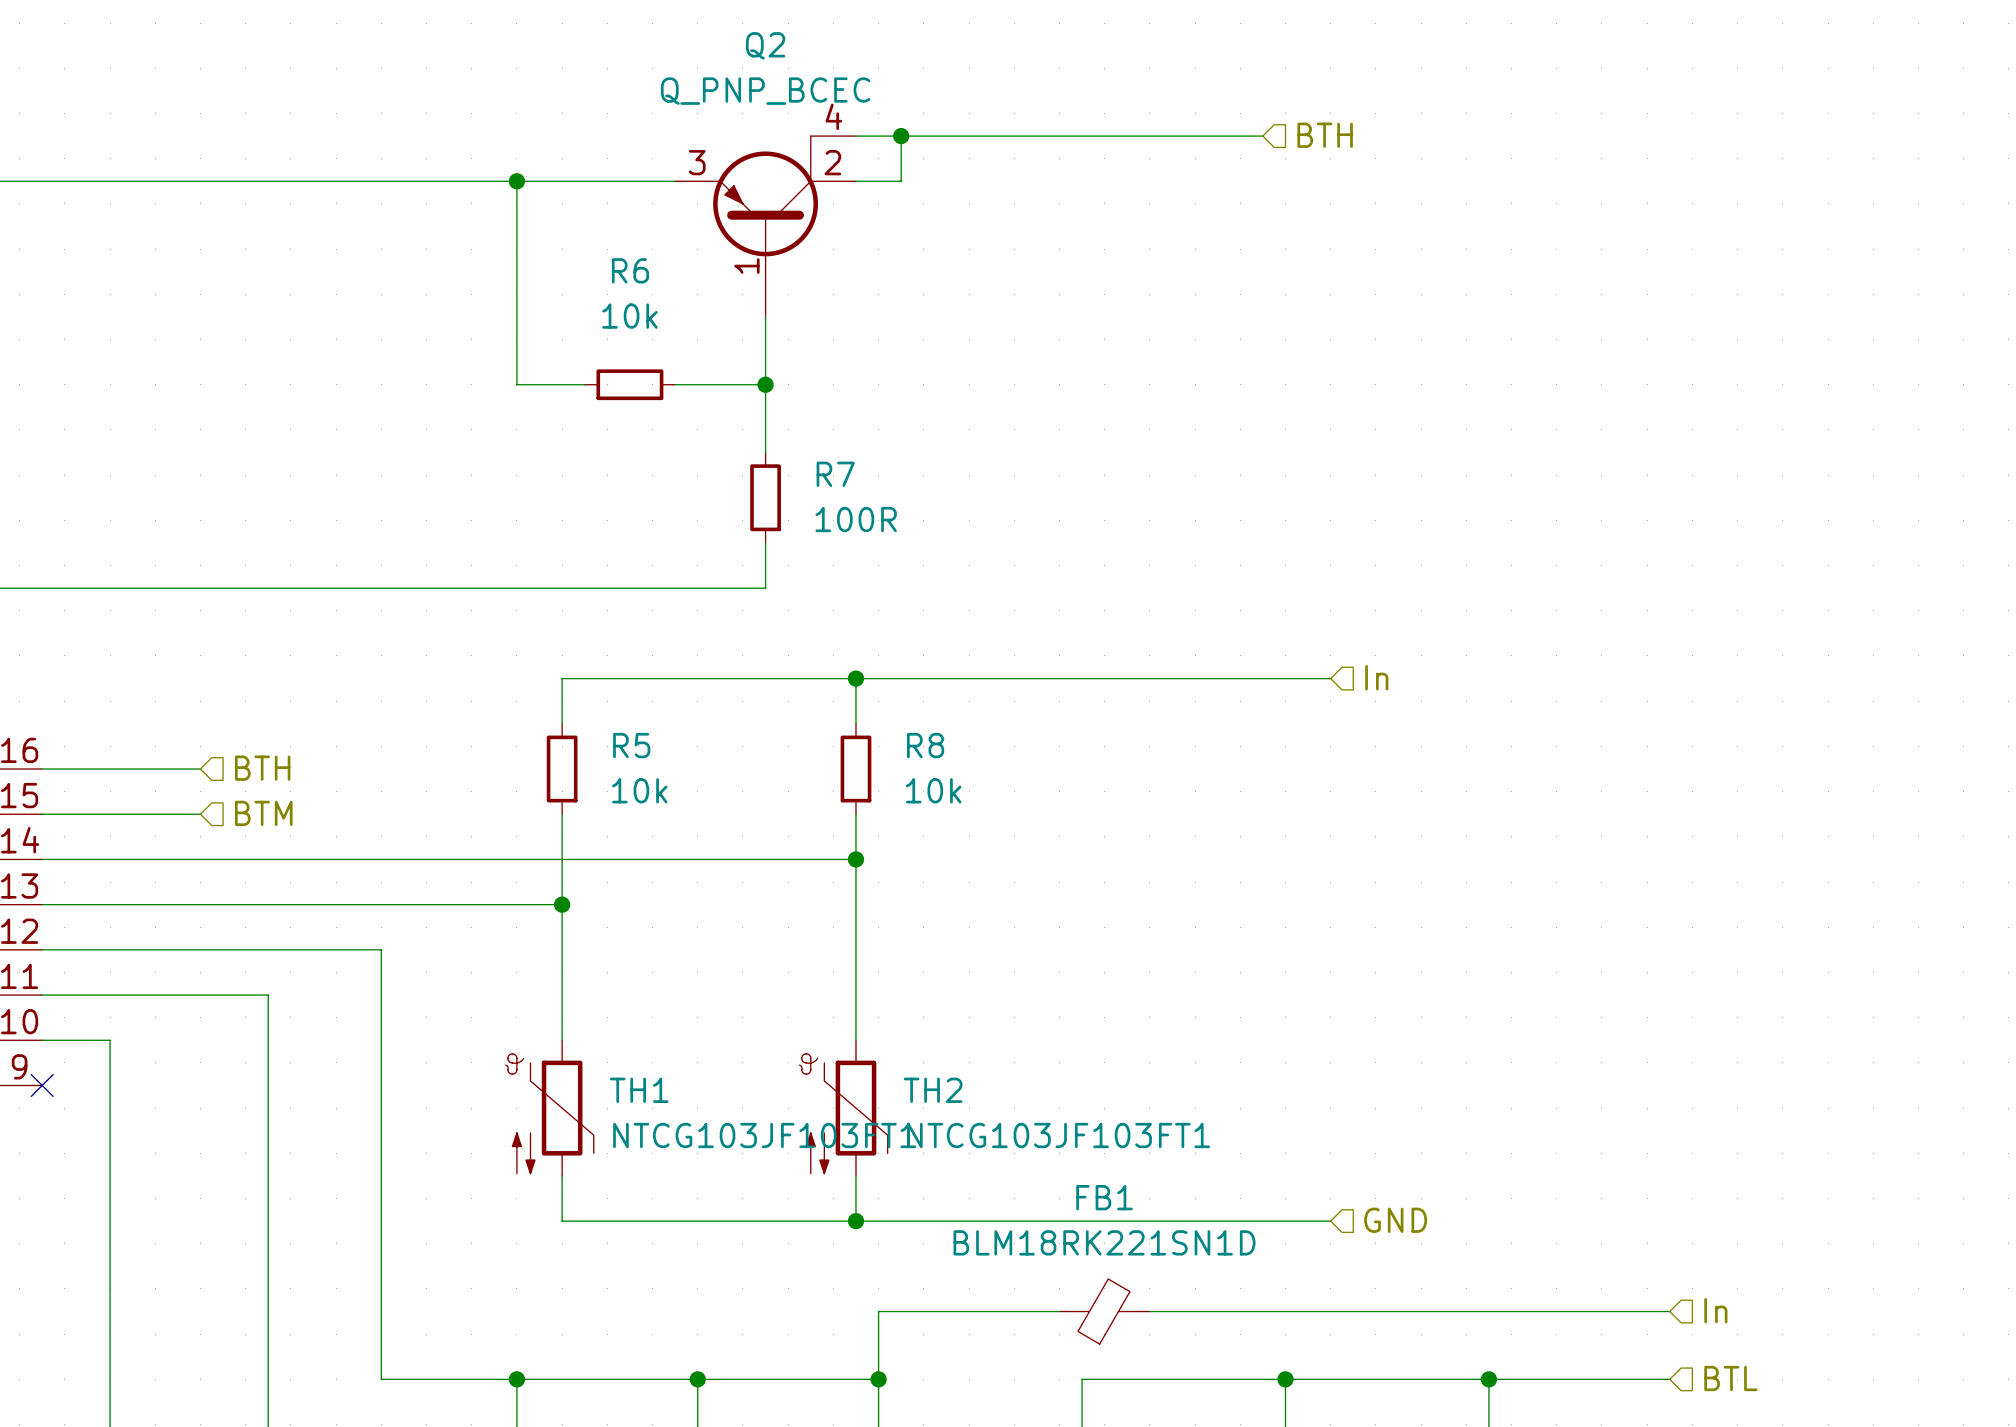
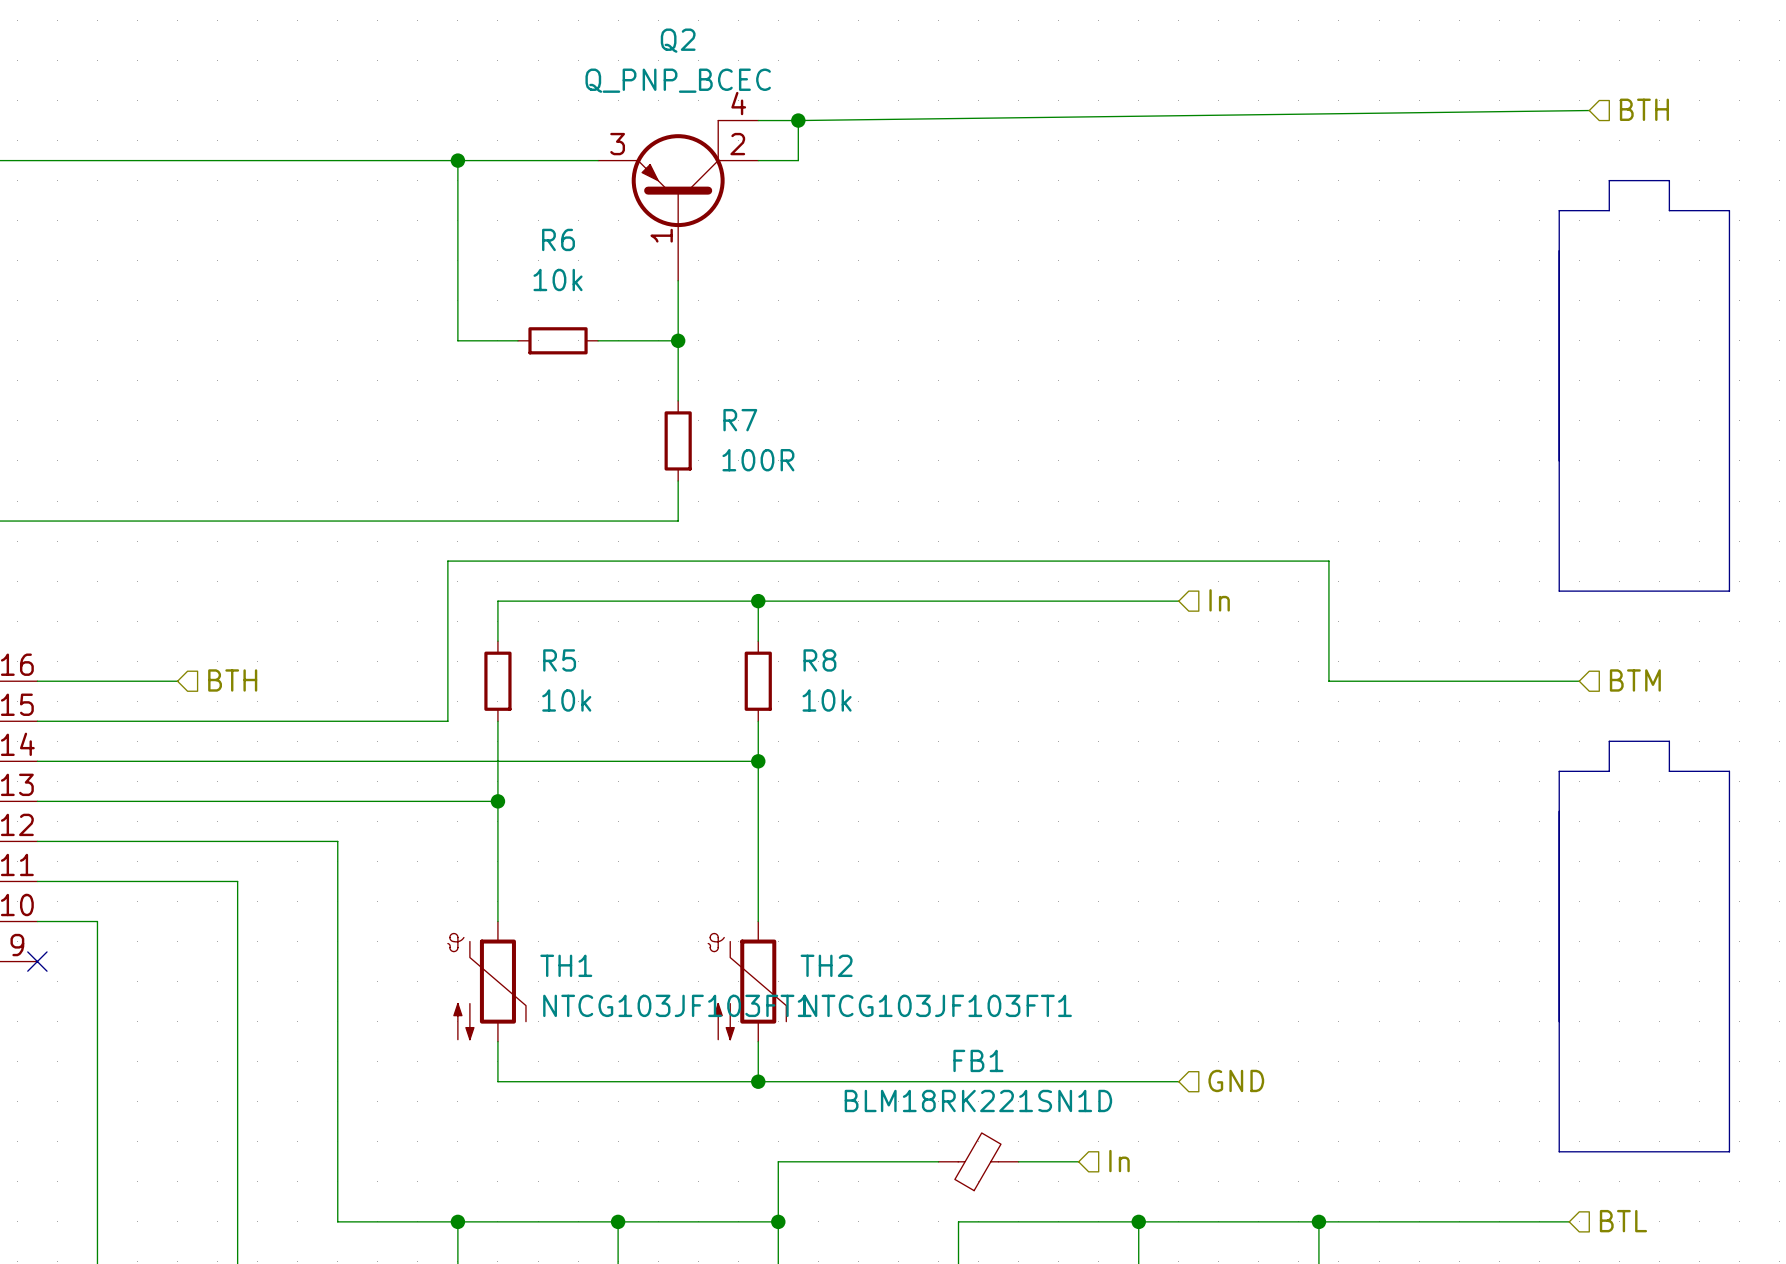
hierarchical label: none -> BTH (1644, 109)
hierarchical label: BTH (1325, 135) -> none
wire: (901, 136) (1262, 136) -> (798, 120) (1589, 110)
line: none -> (1609, 180) (1609, 210) (1559, 210) (1559, 591) (1729, 591) (1729, 210) (1669, 210) (1669, 180) (1609, 180)
hierarchical label: none -> BTM (1635, 680)
wire: none -> (1579, 681) (1328, 681) (1328, 561) (447, 561) (447, 721) (177, 721)
hierarchical label: BTM (263, 813) -> none
line: none -> (1609, 741) (1669, 741) (1669, 771) (1729, 771) (1729, 1151) (1559, 1151) (1559, 771) (1609, 771) (1609, 741)
hierarchical label: none -> In (1119, 1161)
hierarchical label: In (1715, 1310) -> none
wire: (1217, 1311) (1669, 1311) -> none
hierarchical label position: BTL (1730, 1378) -> BTL (1623, 1221)
wire: none -> (1479, 1221) (1569, 1221)

